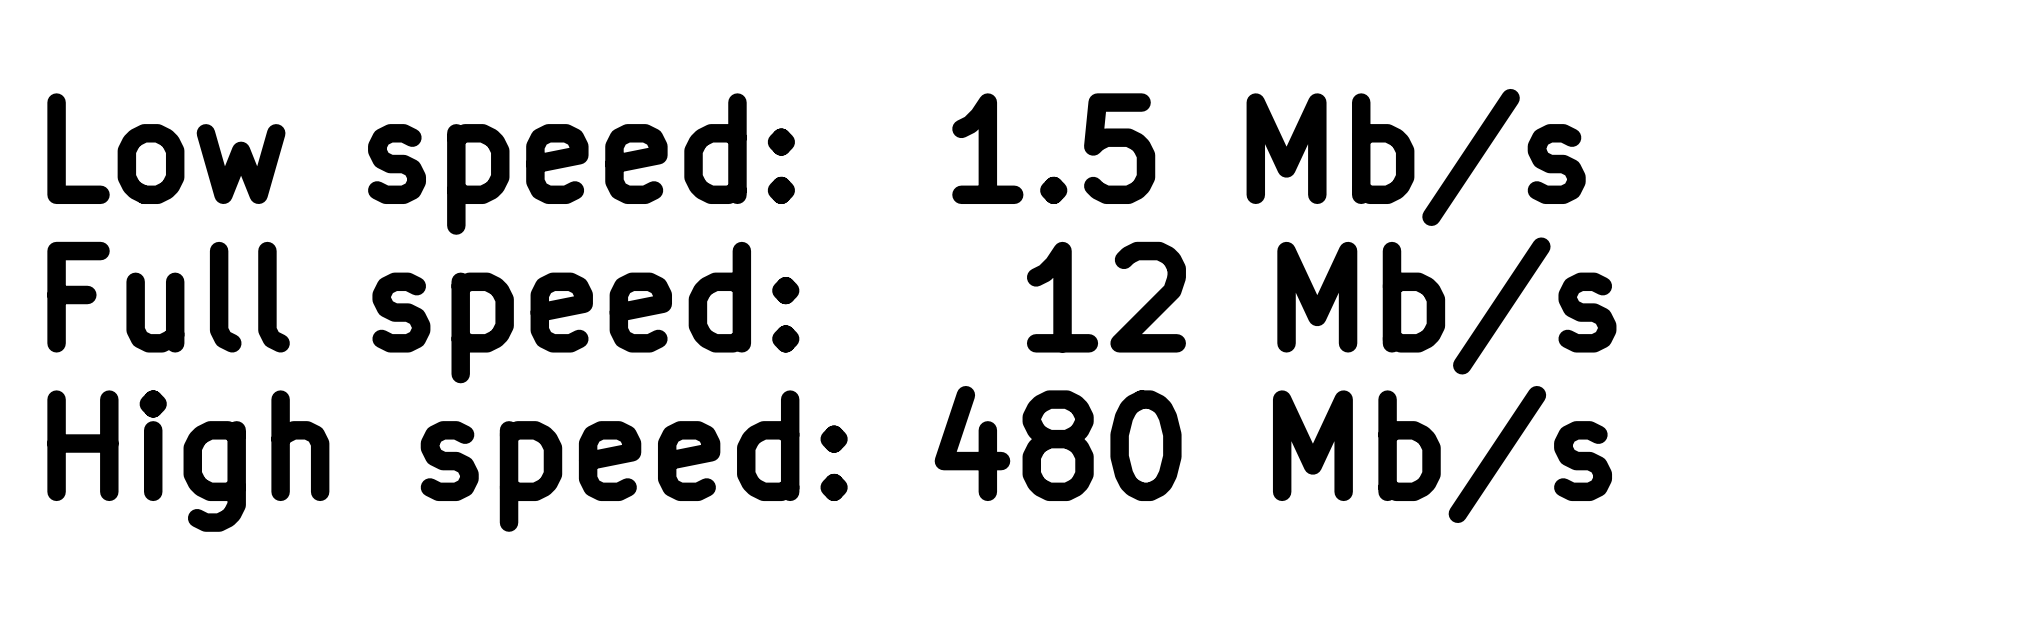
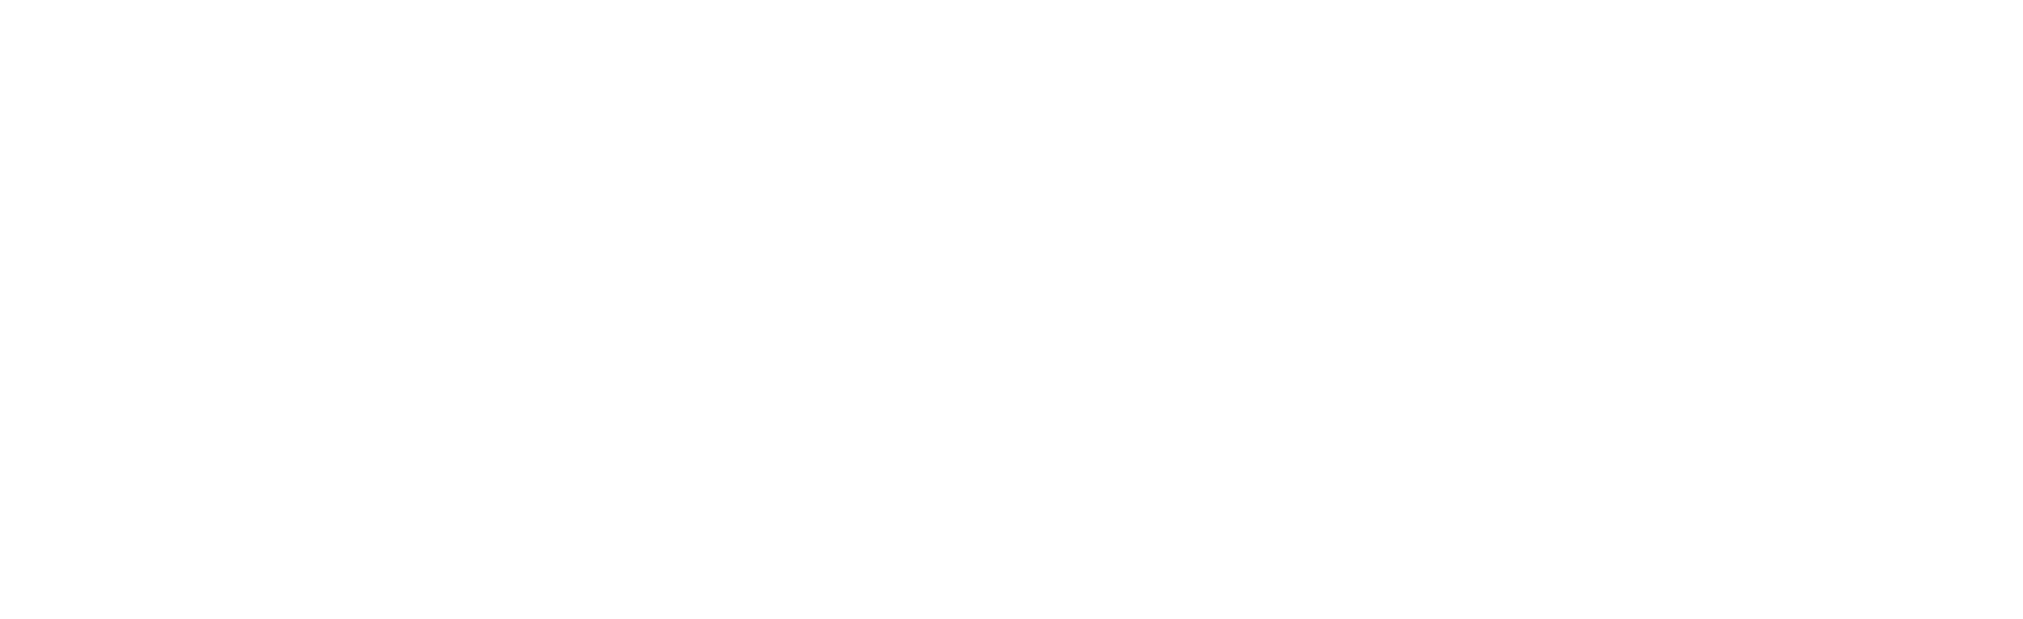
text: Low speed: 1.5 Mb/s (816, 161) -> none
text: Full speed: 12 Mb/s (831, 310) -> none
text: High speed: 480 Mb/s (829, 458) -> none

